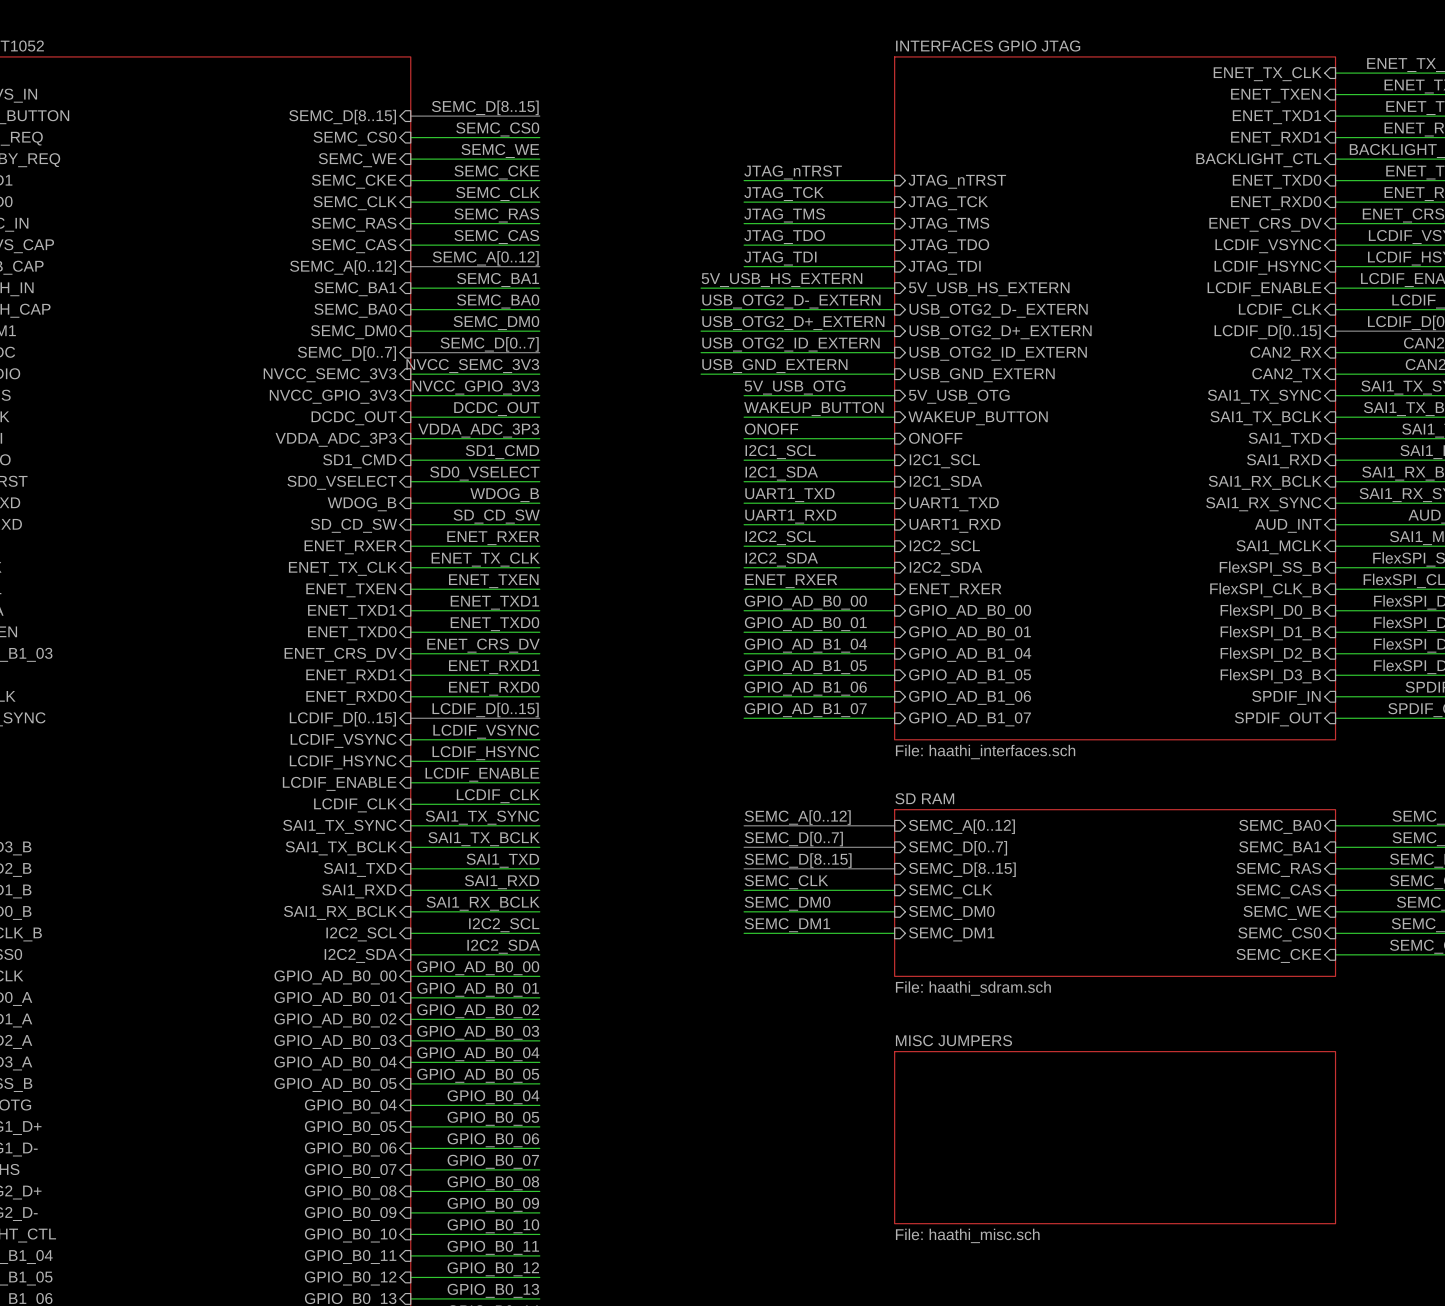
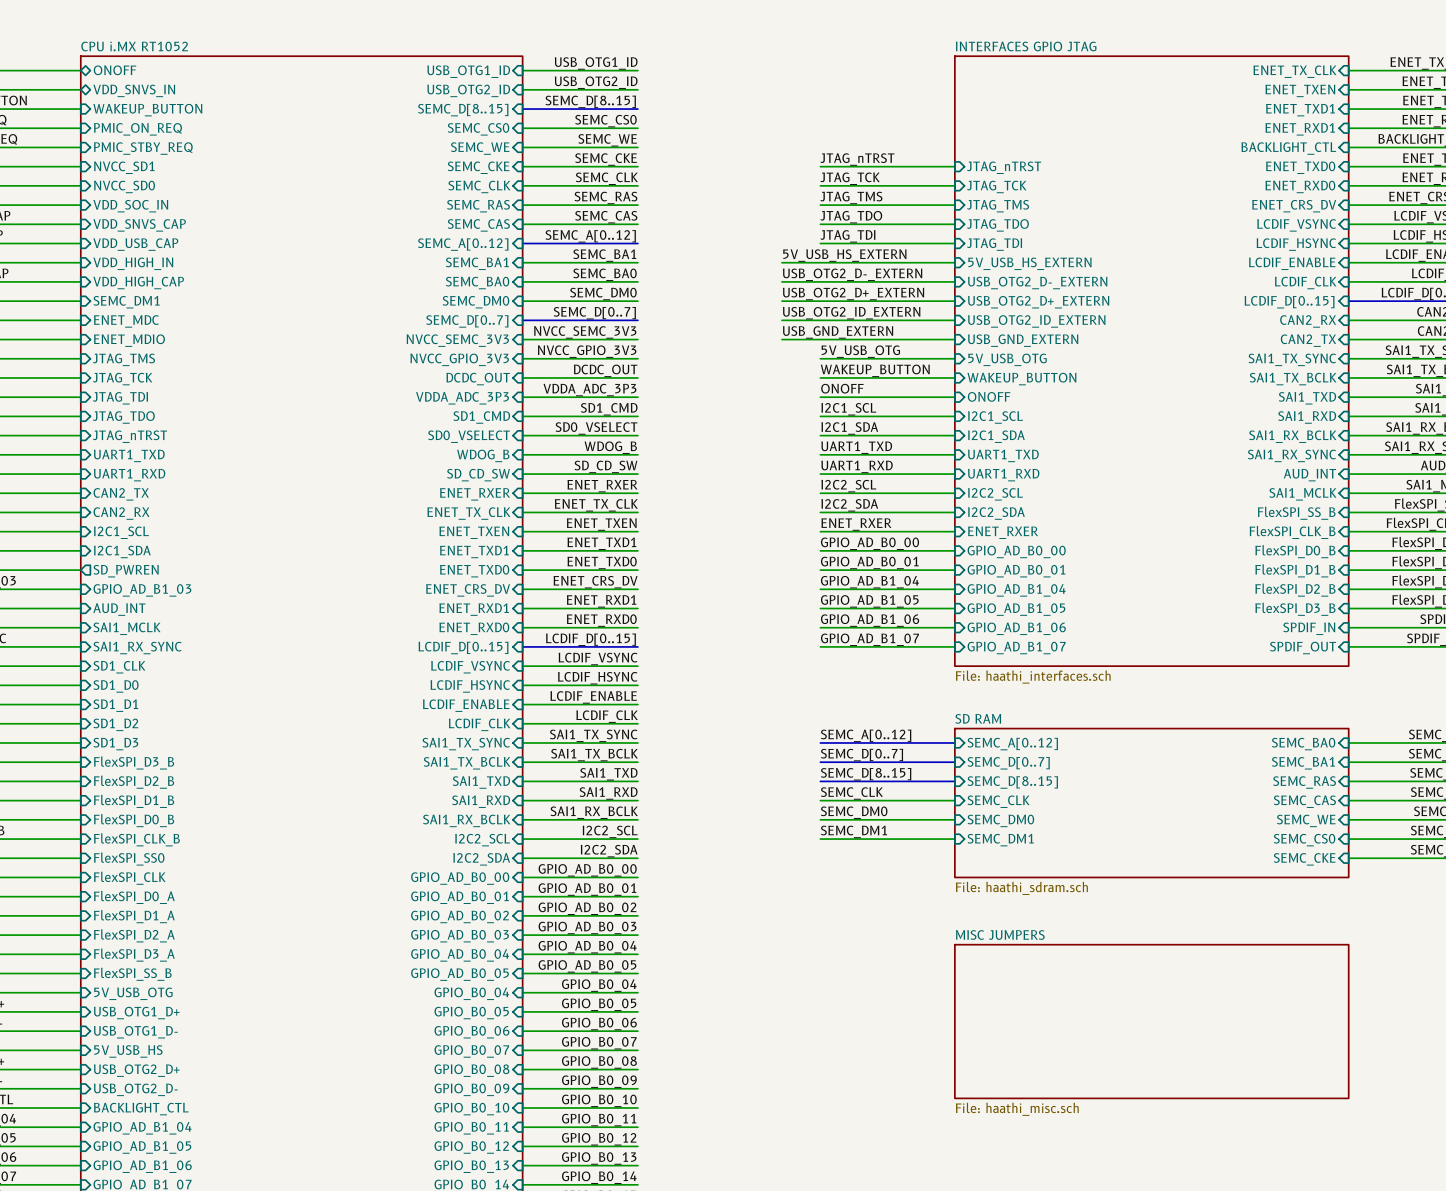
label: none -> USB_OTG1_ID (596, 63)
wire: none -> (522, 70) (637, 70)
sheet pin: none -> USB_OTG1_ID (468, 71)
label: none -> USB_OTG2_ID (596, 82)
wire: none -> (522, 89) (637, 89)
sheet pin: none -> USB_OTG2_ID (468, 90)

